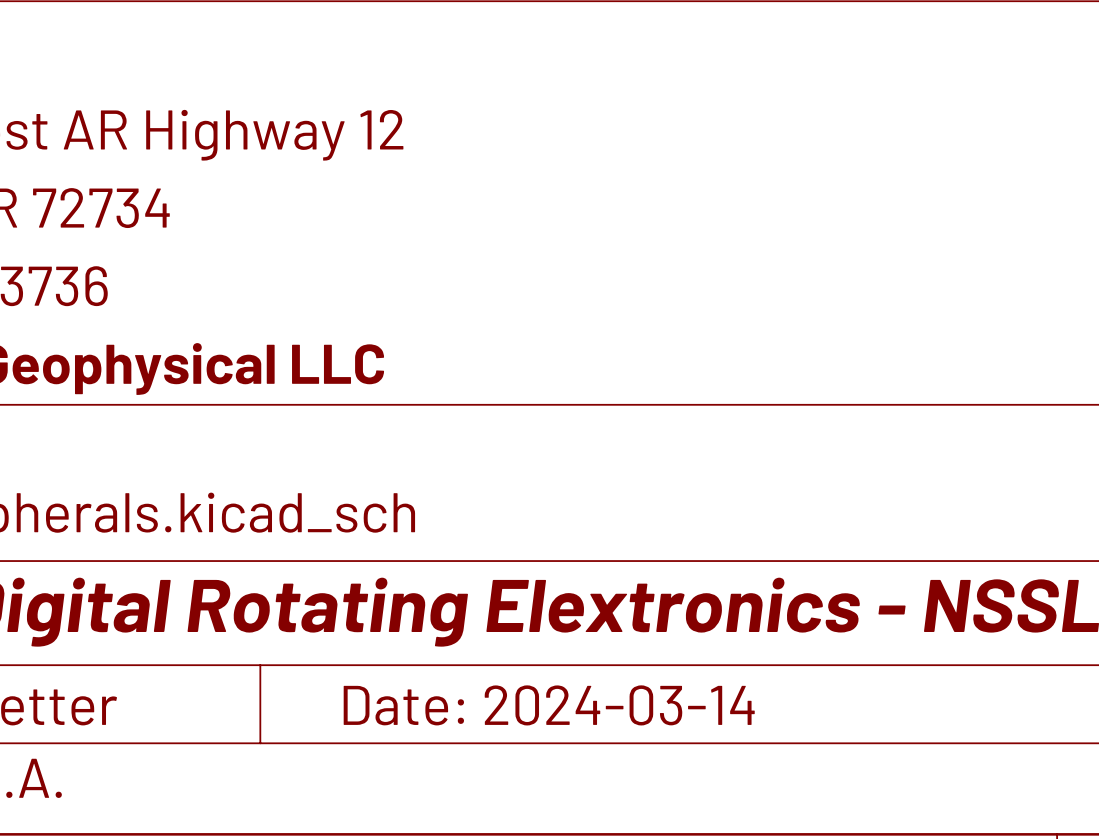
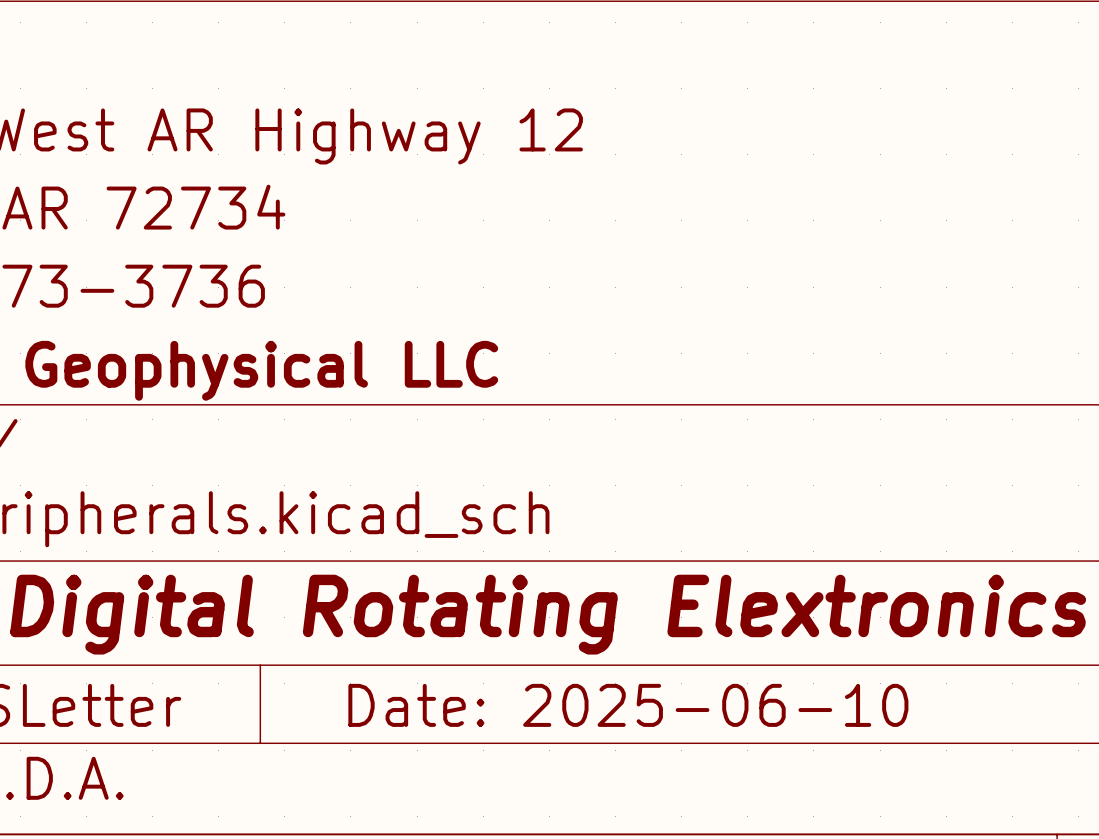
title block: Date: 2024-03-14 (549, 705) -> Date: 2025-06-10 (628, 705)

